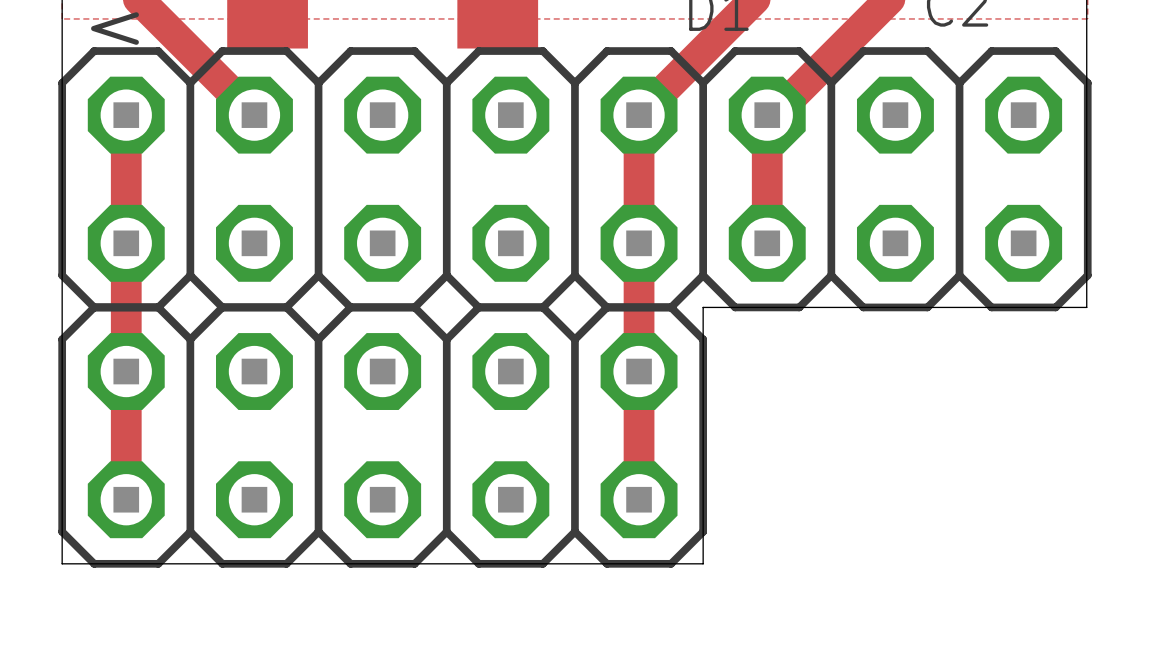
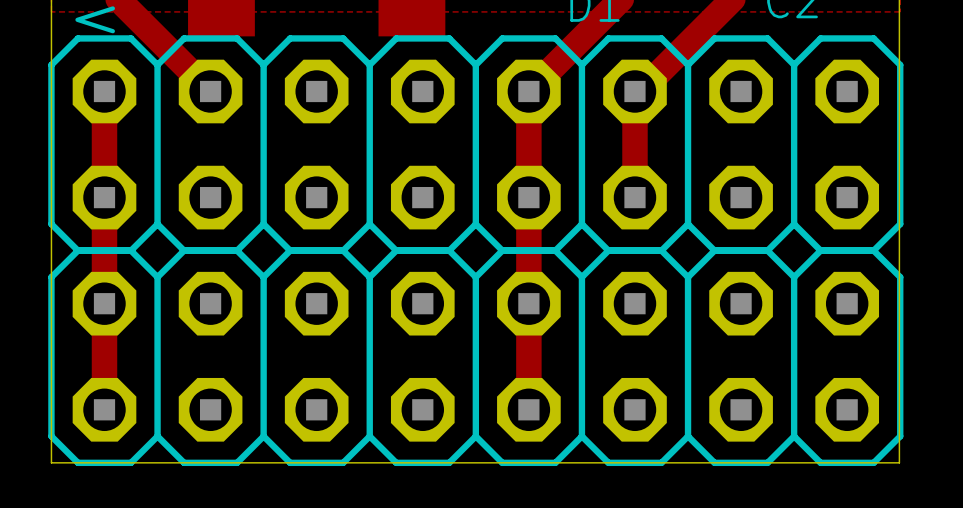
board edge: (1086, 307) (703, 307) (703, 563) -> (899, 250) (899, 462) (581, 462)
part: (382, 435) -> none
part: none -> (475, 356)

